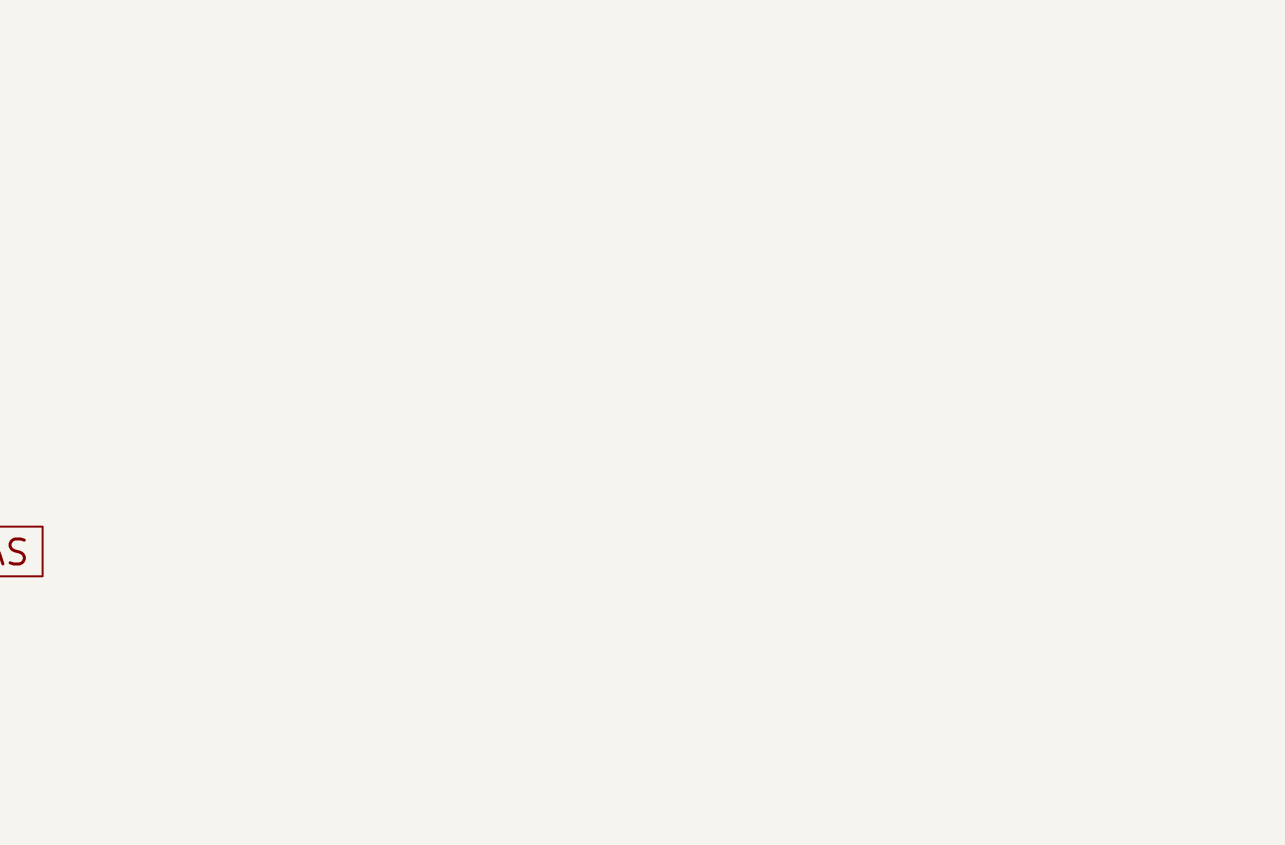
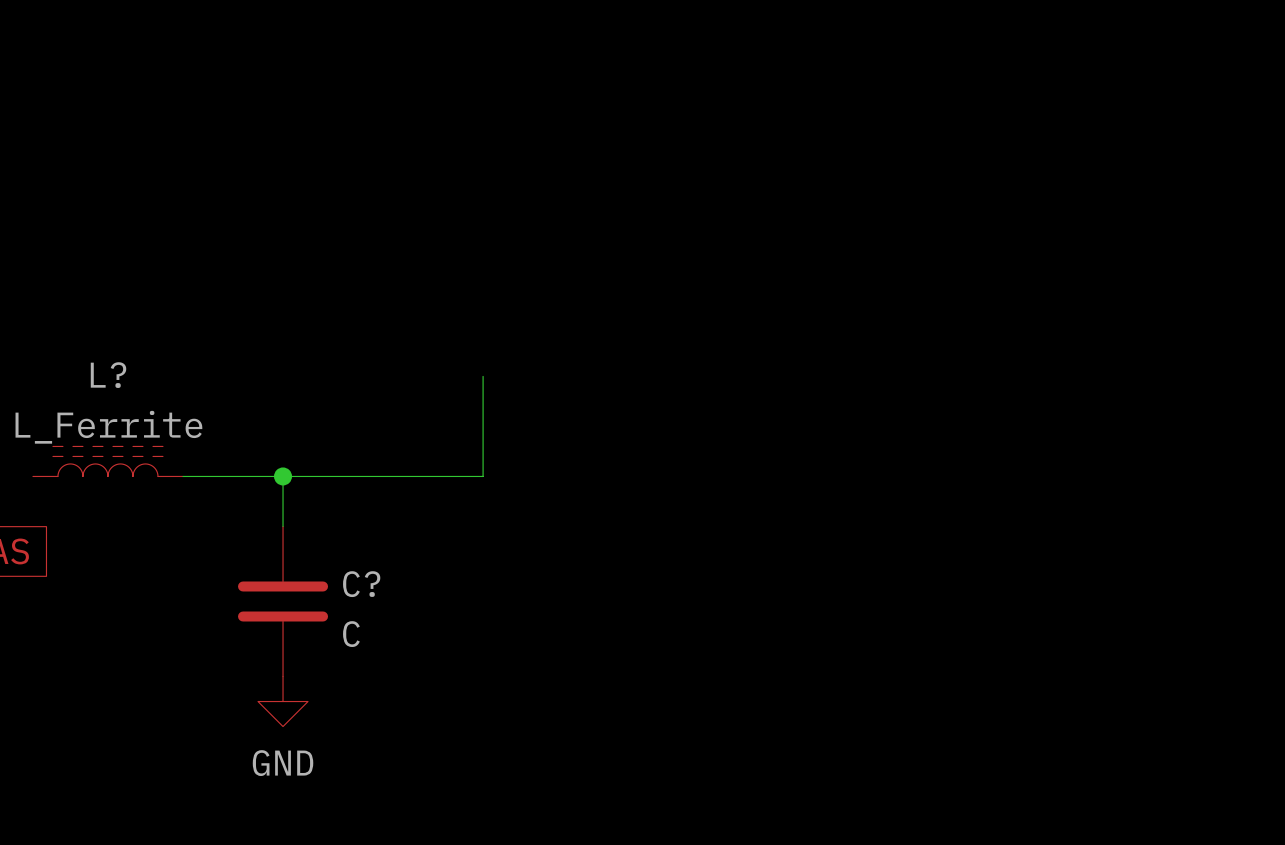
wire: none -> (483, 376) (483, 476) (182, 476)
L?: none -> L_Ferrite (107, 461)
wire: none -> (283, 476) (283, 526)
junction: none -> (283, 476)
C?: none -> C (283, 601)
power symbol: none -> GND (283, 701)

